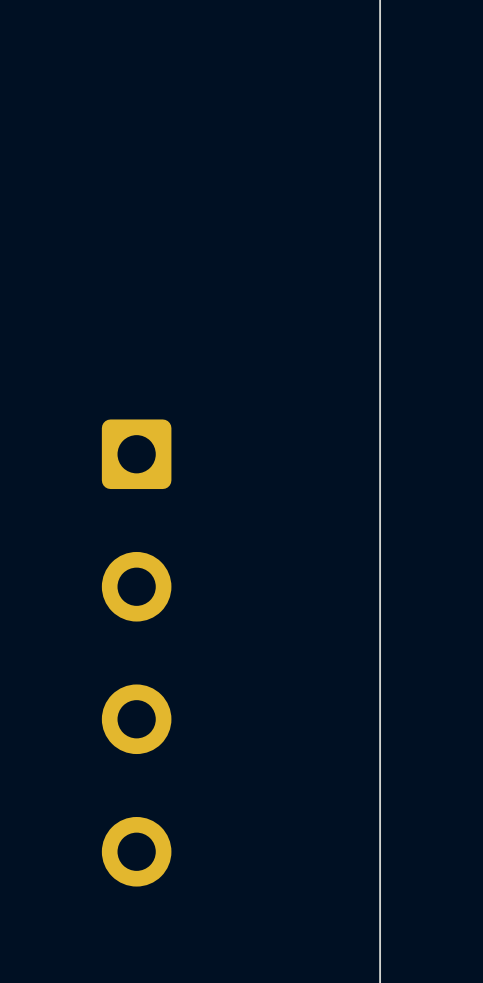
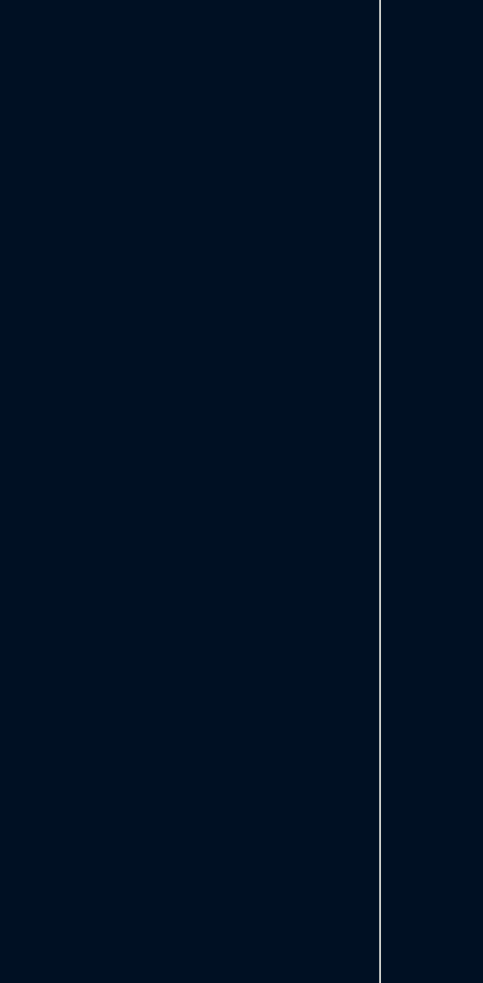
part: (136, 653) -> none

